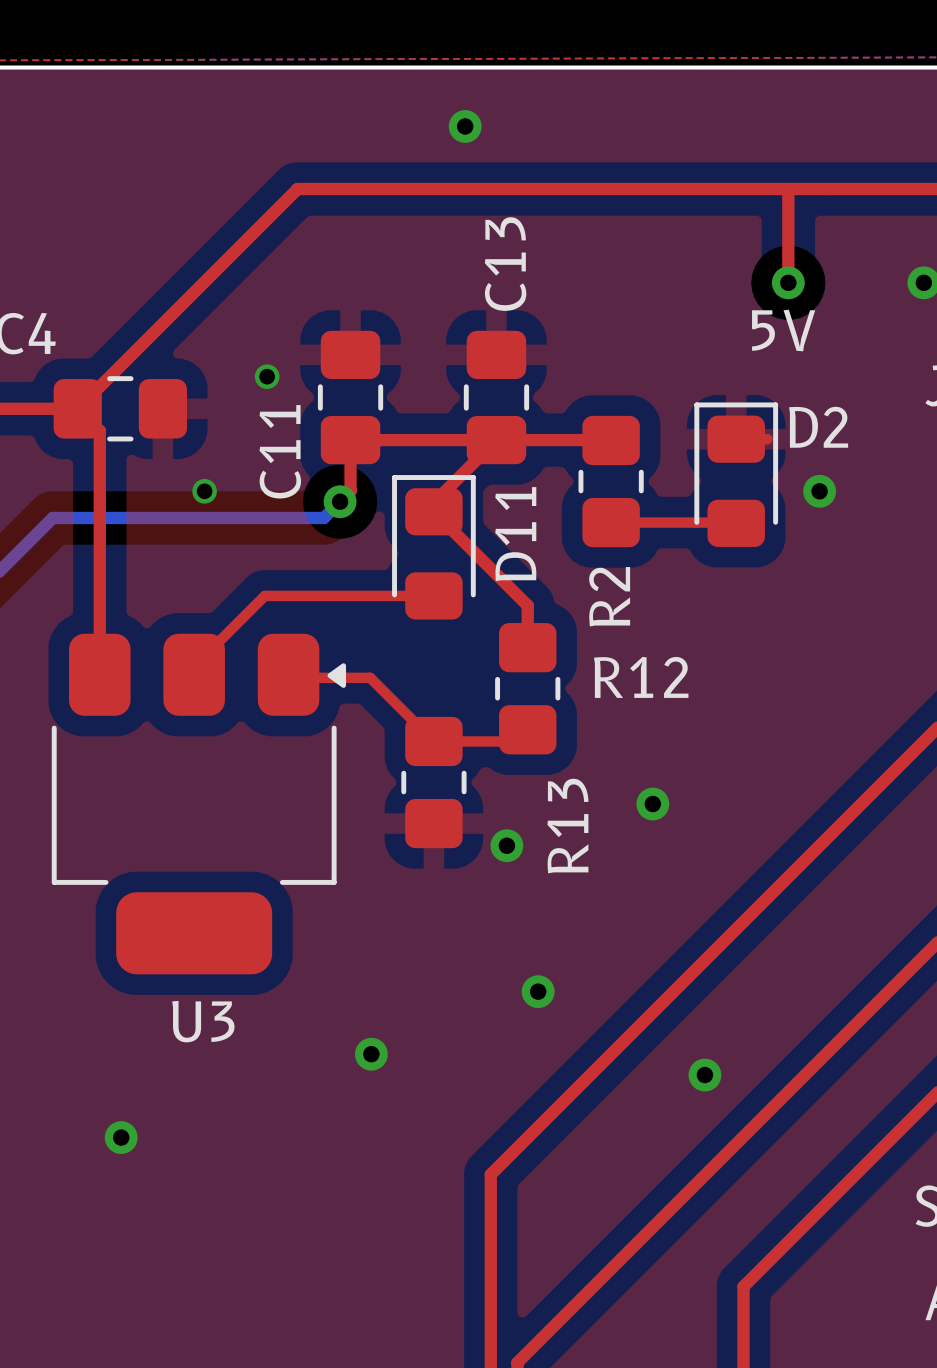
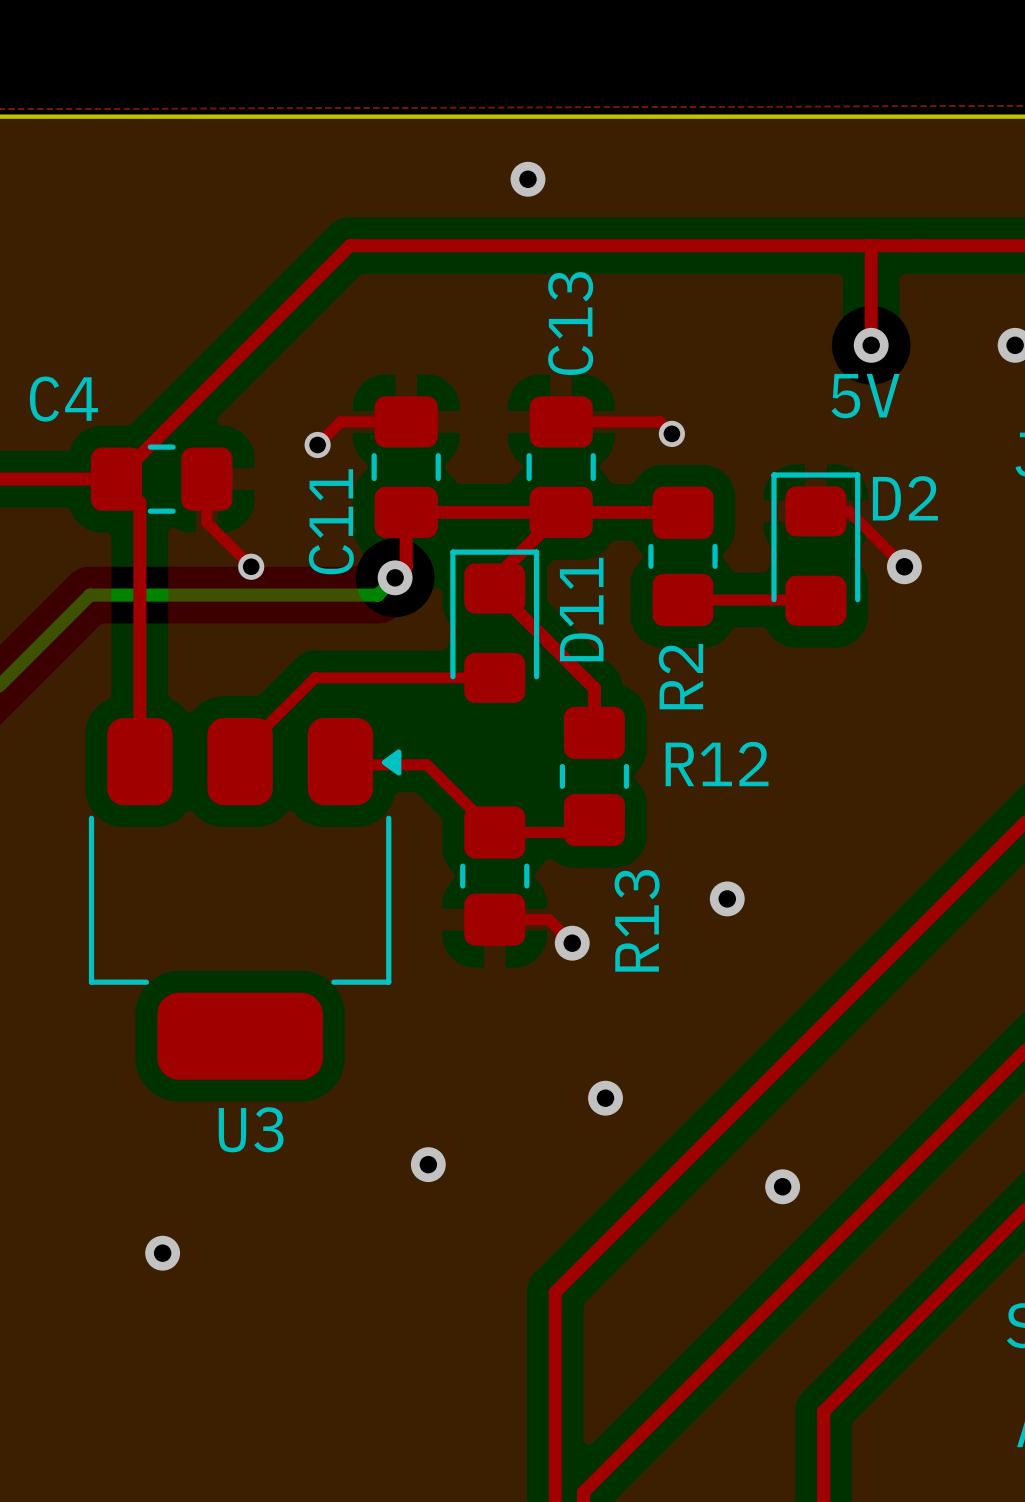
top track: none -> (406, 421) (340, 421) (317, 444)
top track: none -> (561, 421) (659, 421) (671, 433)
via: none -> (671, 433)
top track: none -> (206, 479) (206, 522) (251, 566)
top track: none -> (849, 511) (904, 566)
top track: none -> (494, 919) (548, 919) (572, 943)

